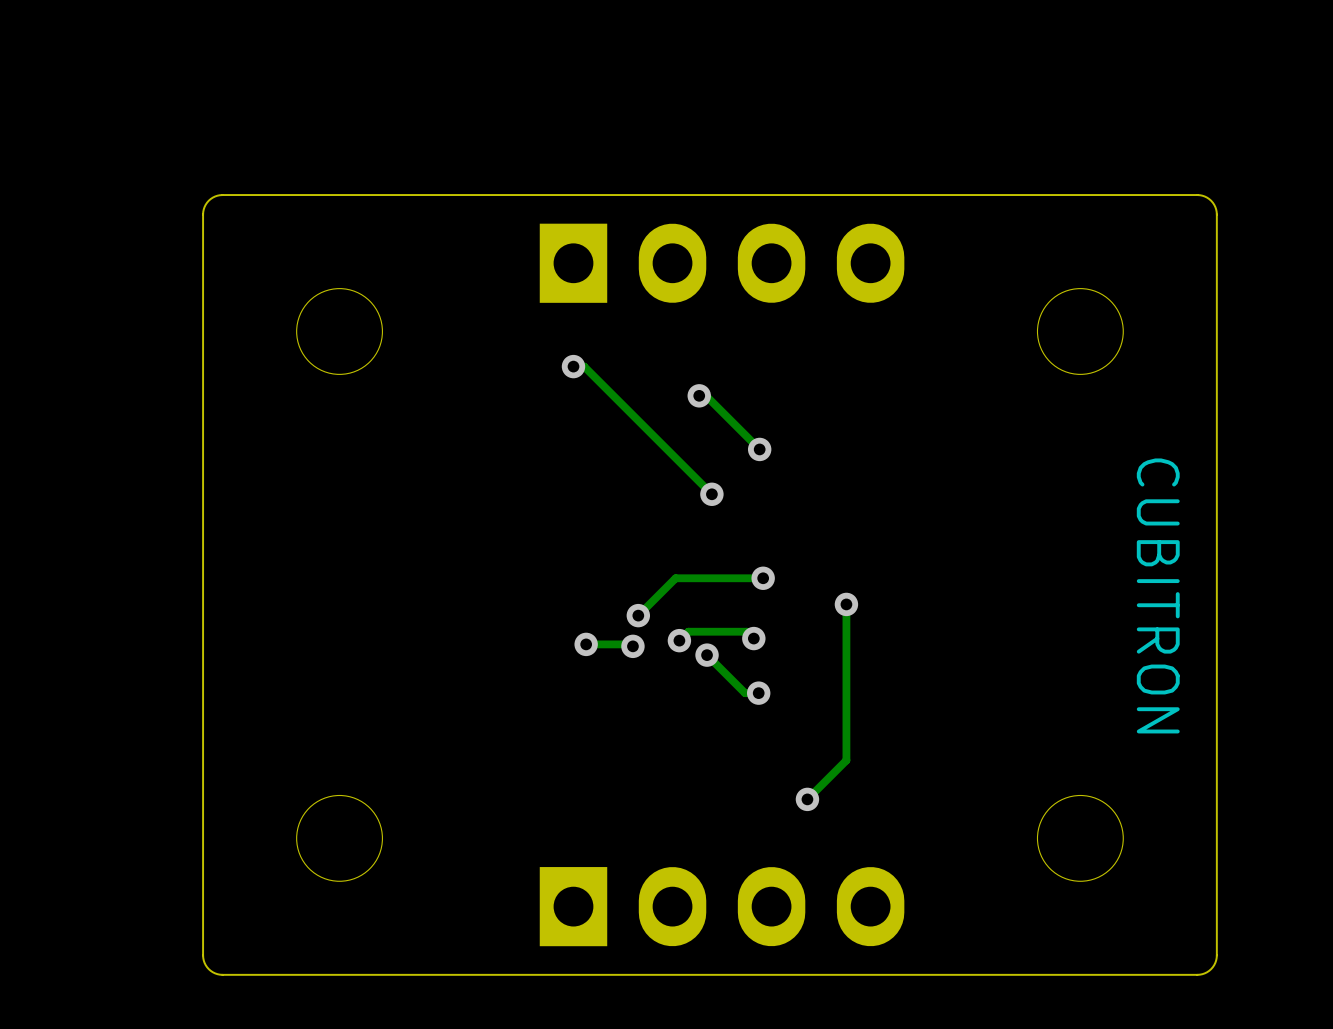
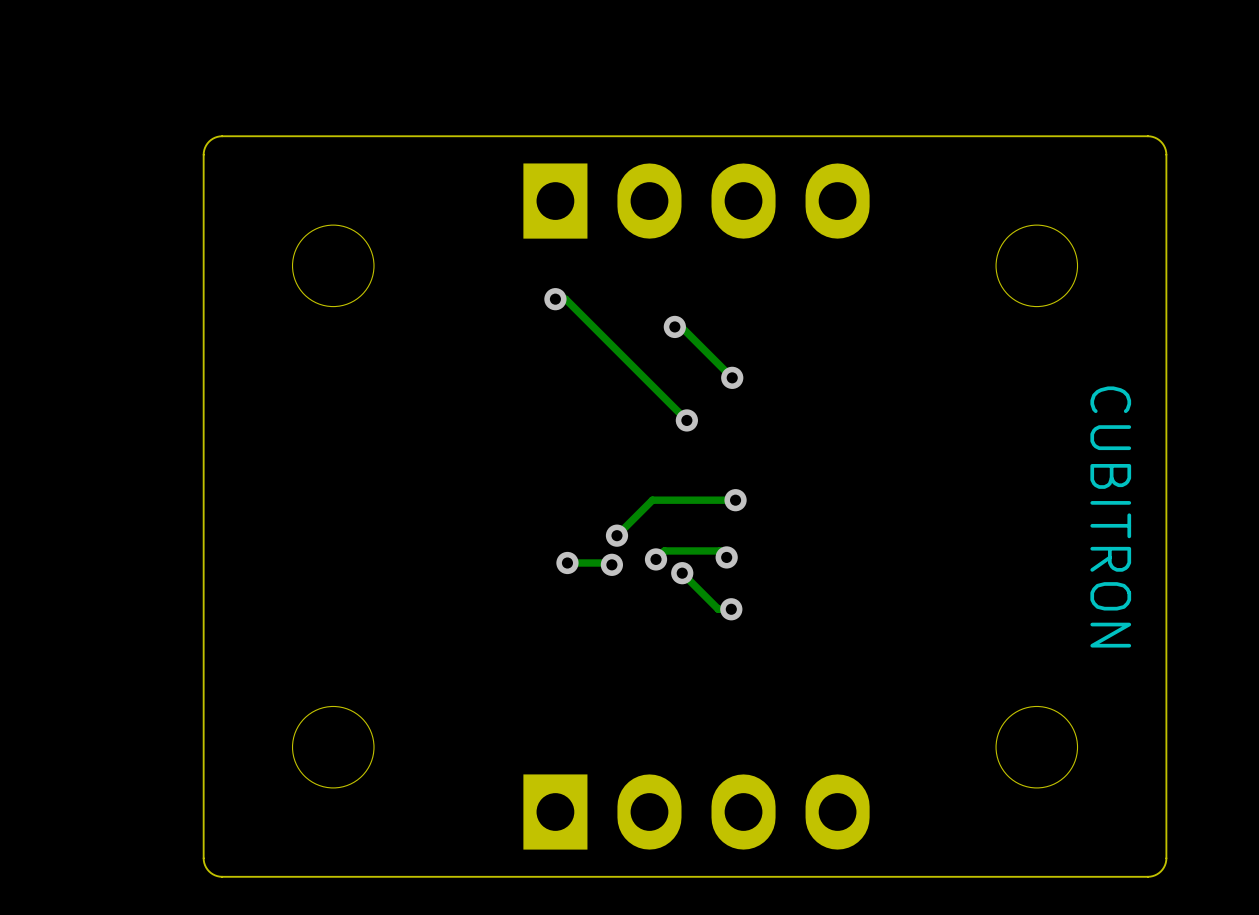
track: (846, 604) (846, 760) (807, 799) -> none
via: (846, 604) -> none
via: (807, 799) -> none

